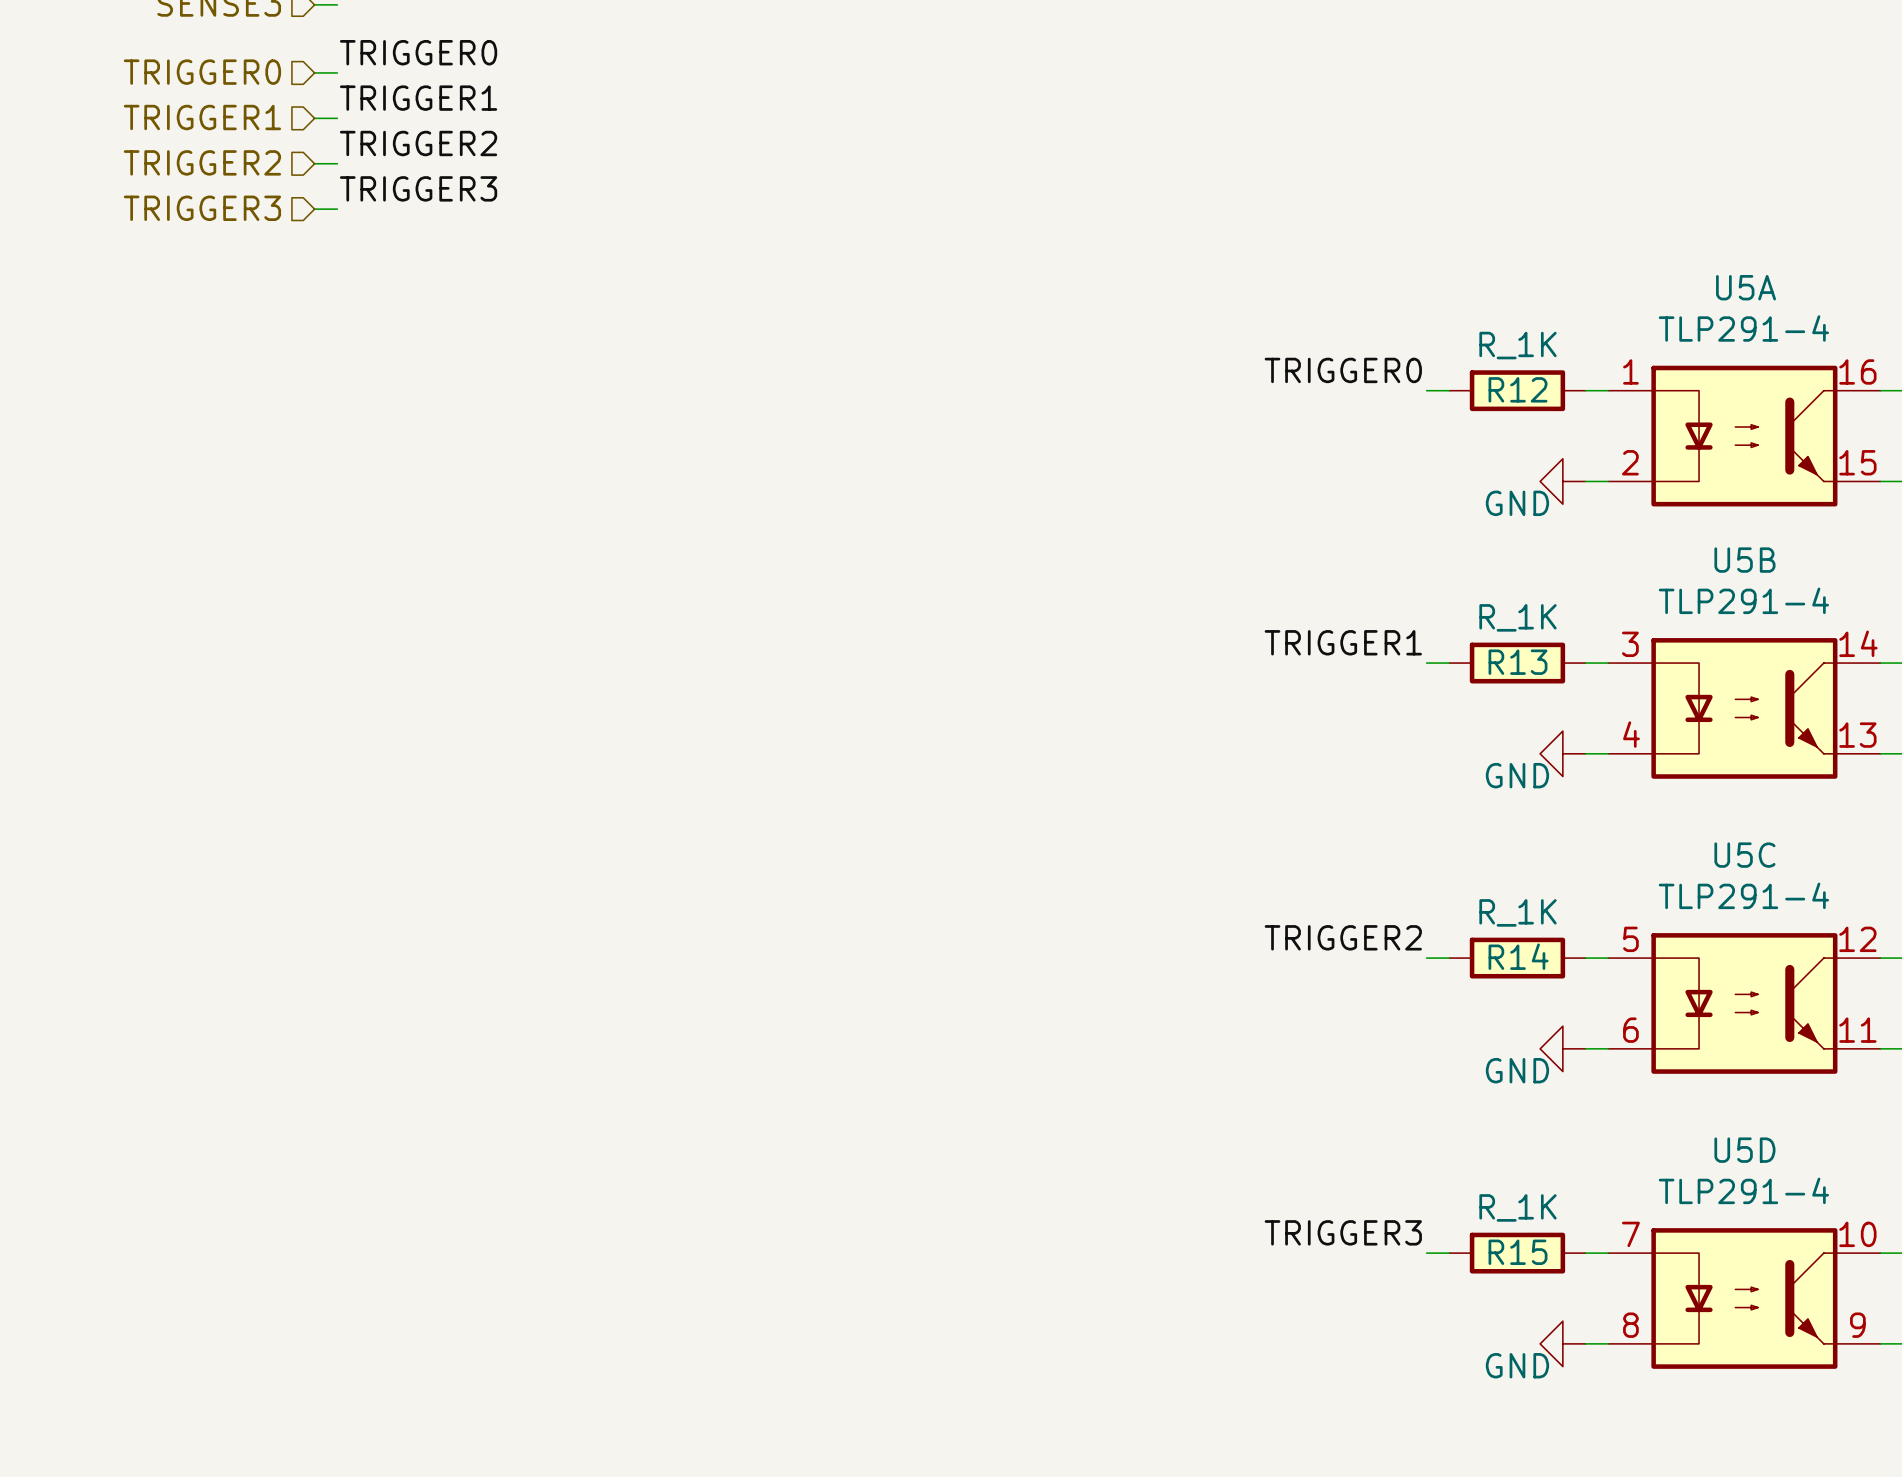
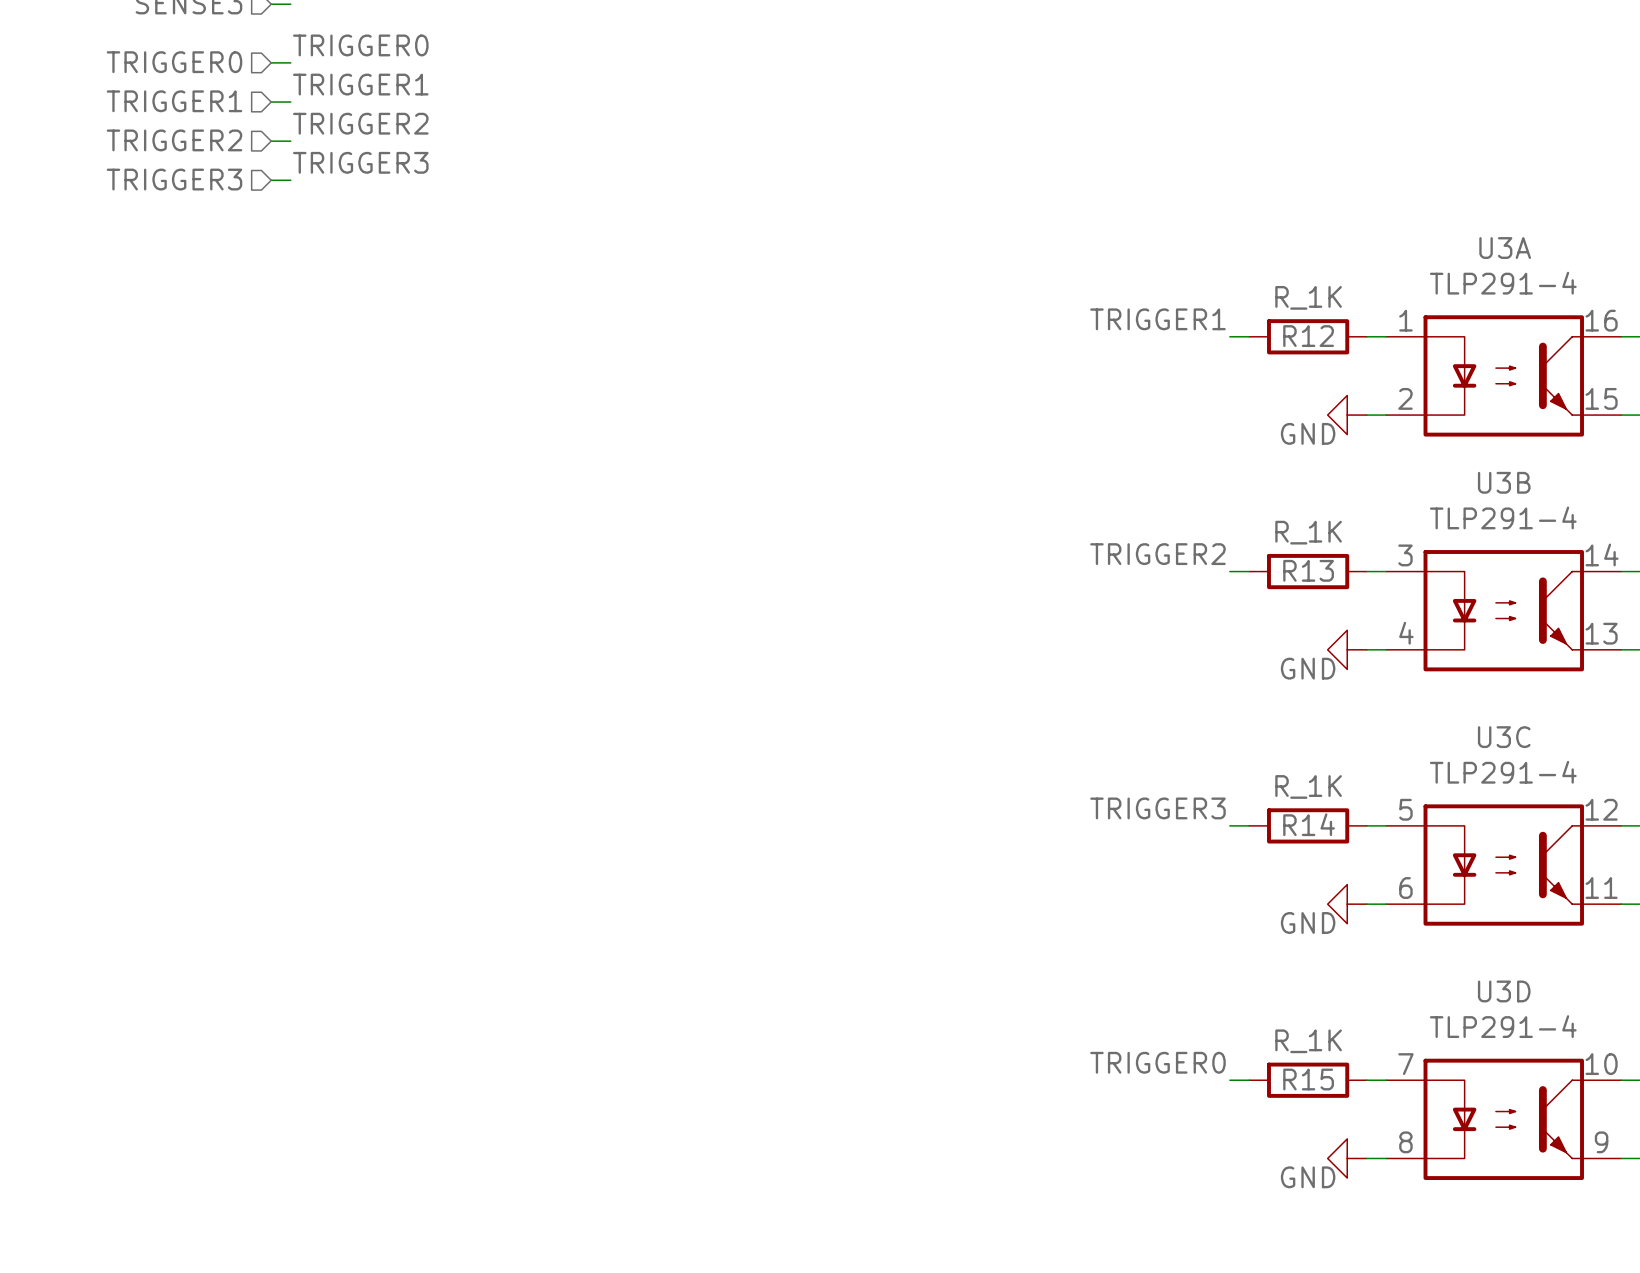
U5A name: U5A (1746, 287) -> U3A (1505, 248)
label: TRIGGER0 (1343, 370) -> TRIGGER1 (1157, 319)
U5B name: U5B (1744, 560) -> U3B (1504, 482)
label: TRIGGER1 (1343, 642) -> TRIGGER2 (1157, 554)
U5C name: U5C (1744, 855) -> U3C (1504, 737)
label: TRIGGER2 (1343, 937) -> TRIGGER3 (1157, 808)
U5D name: U5D (1744, 1150) -> U3D (1504, 991)
label: TRIGGER3 (1343, 1232) -> TRIGGER0 (1157, 1062)

